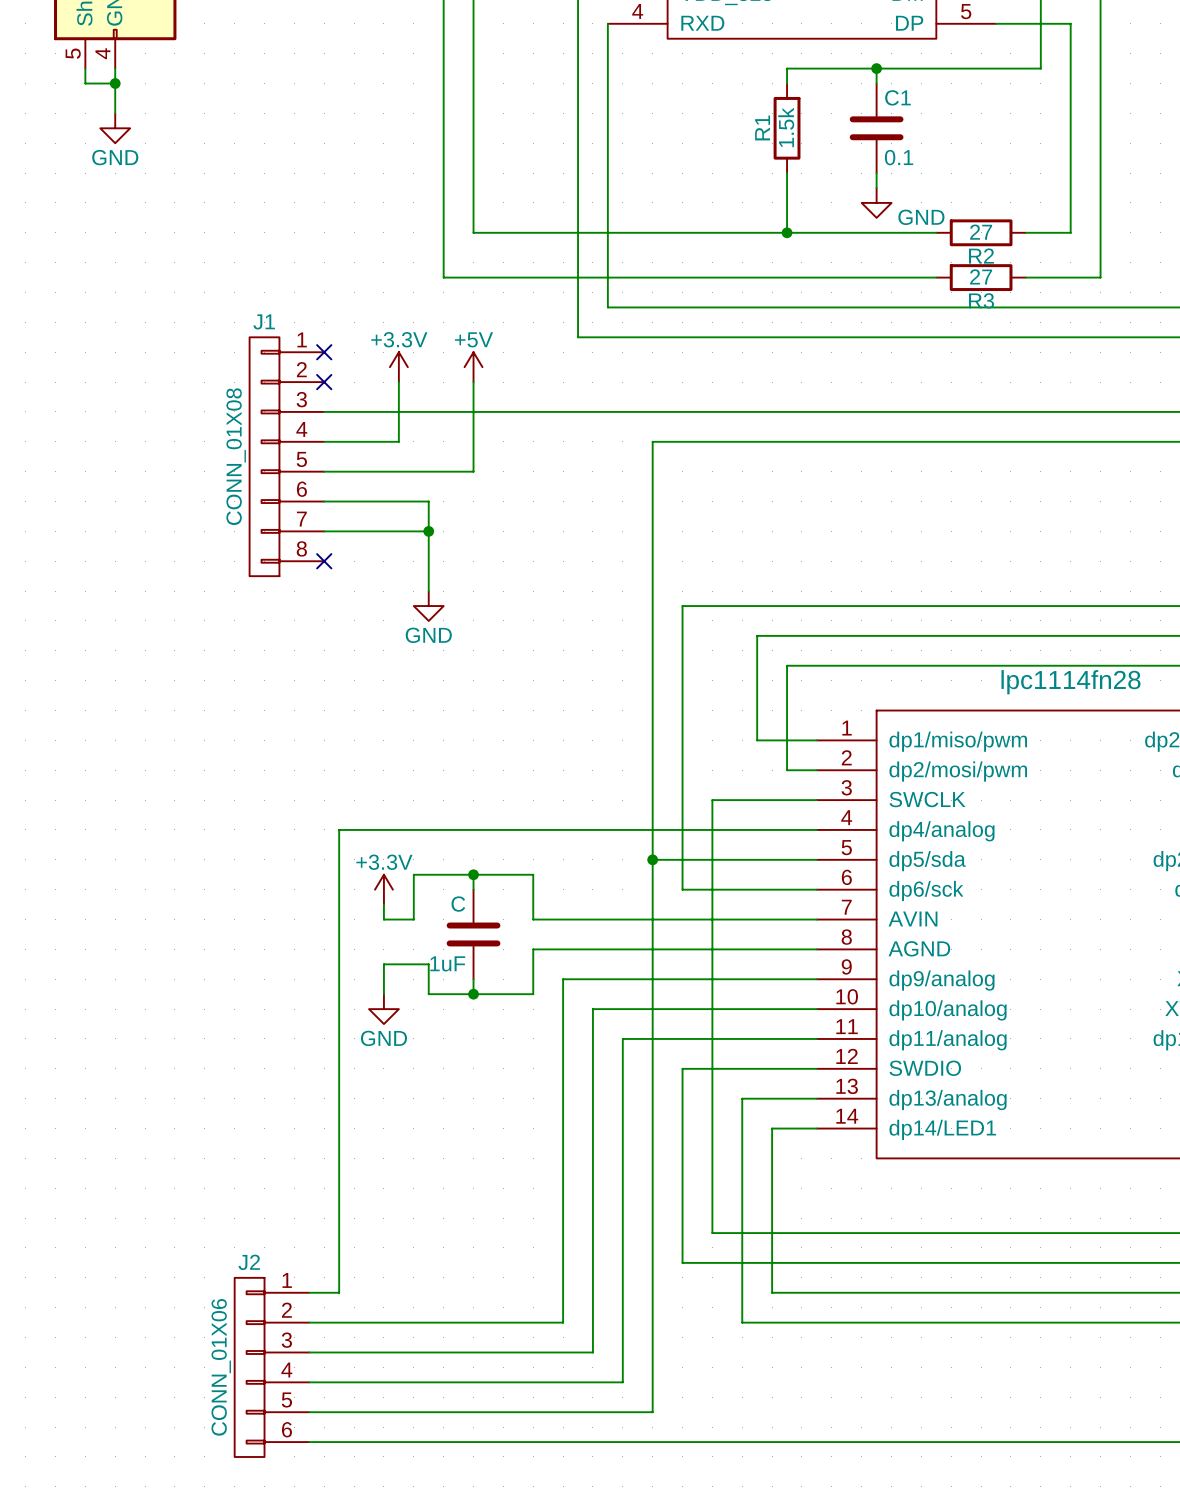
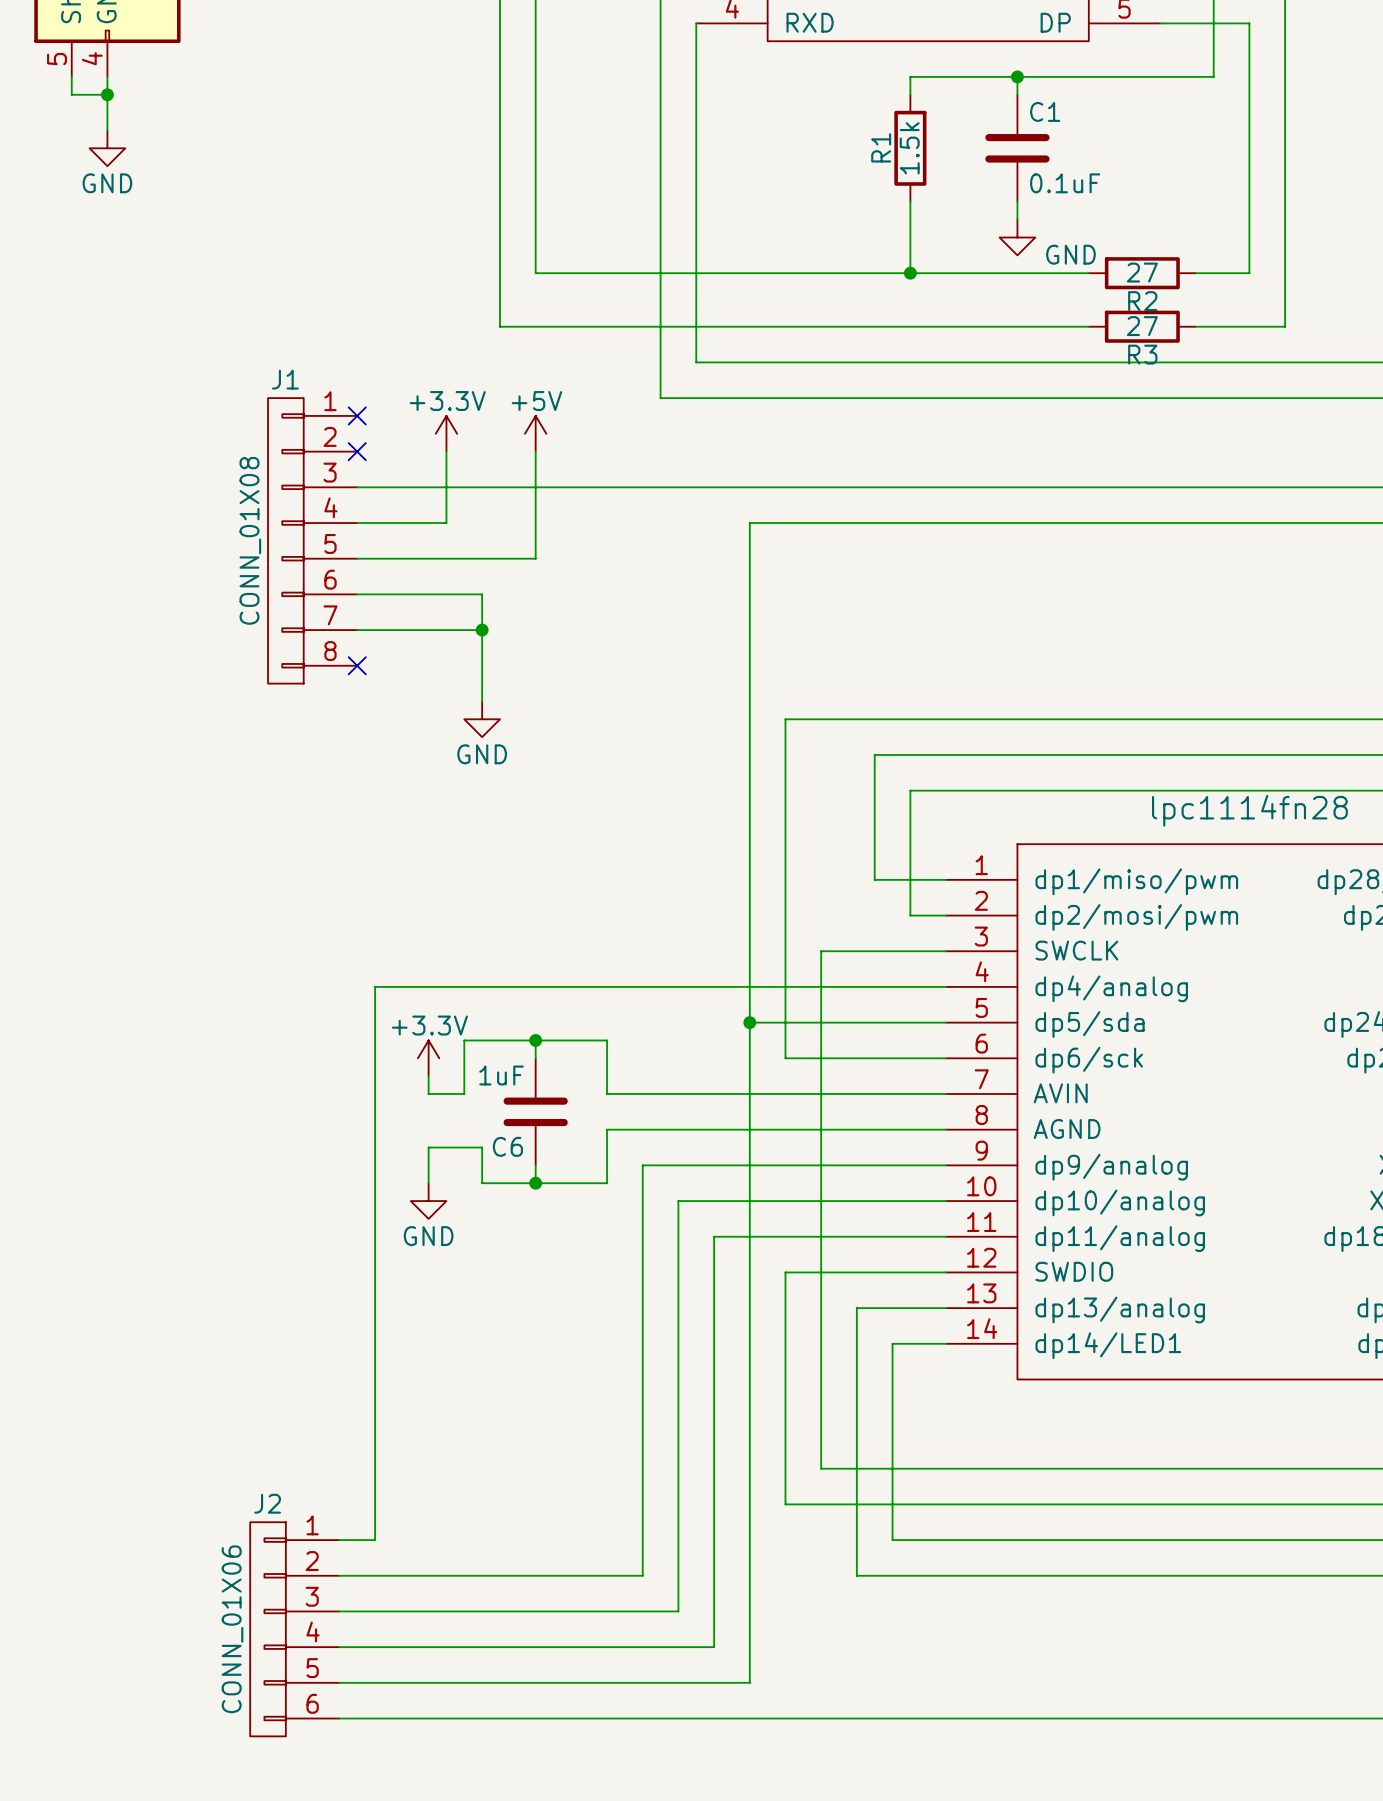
C1 value: 0.1 (899, 157) -> 0.1uF (1065, 183)
1uF value: C (458, 904) -> 1uF (501, 1075)
1uF name: 1uF (447, 963) -> C6 (507, 1146)

